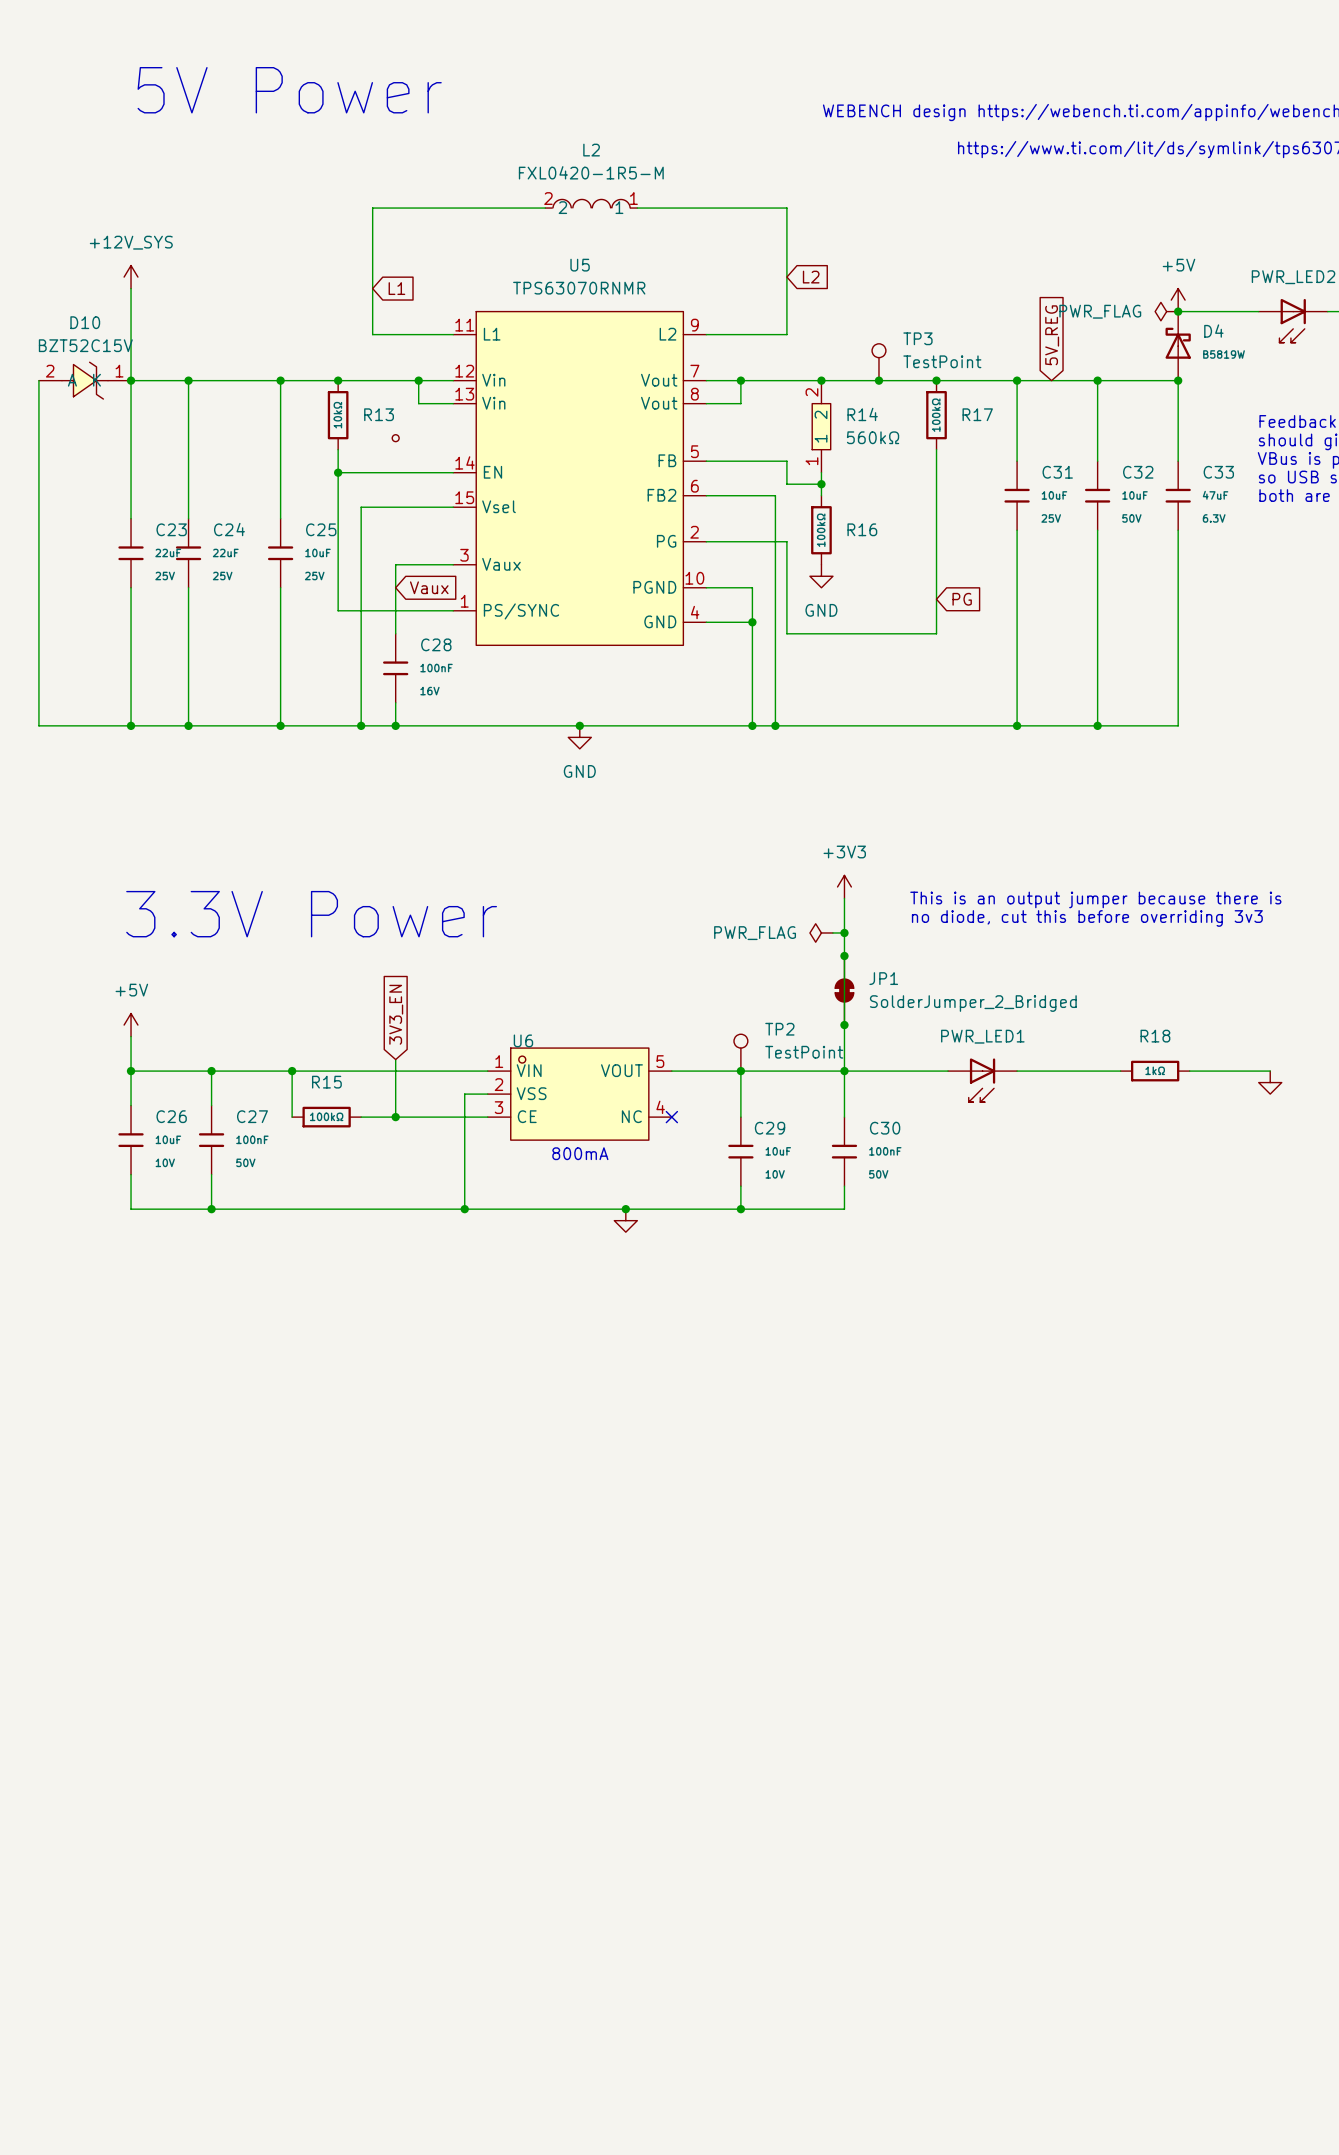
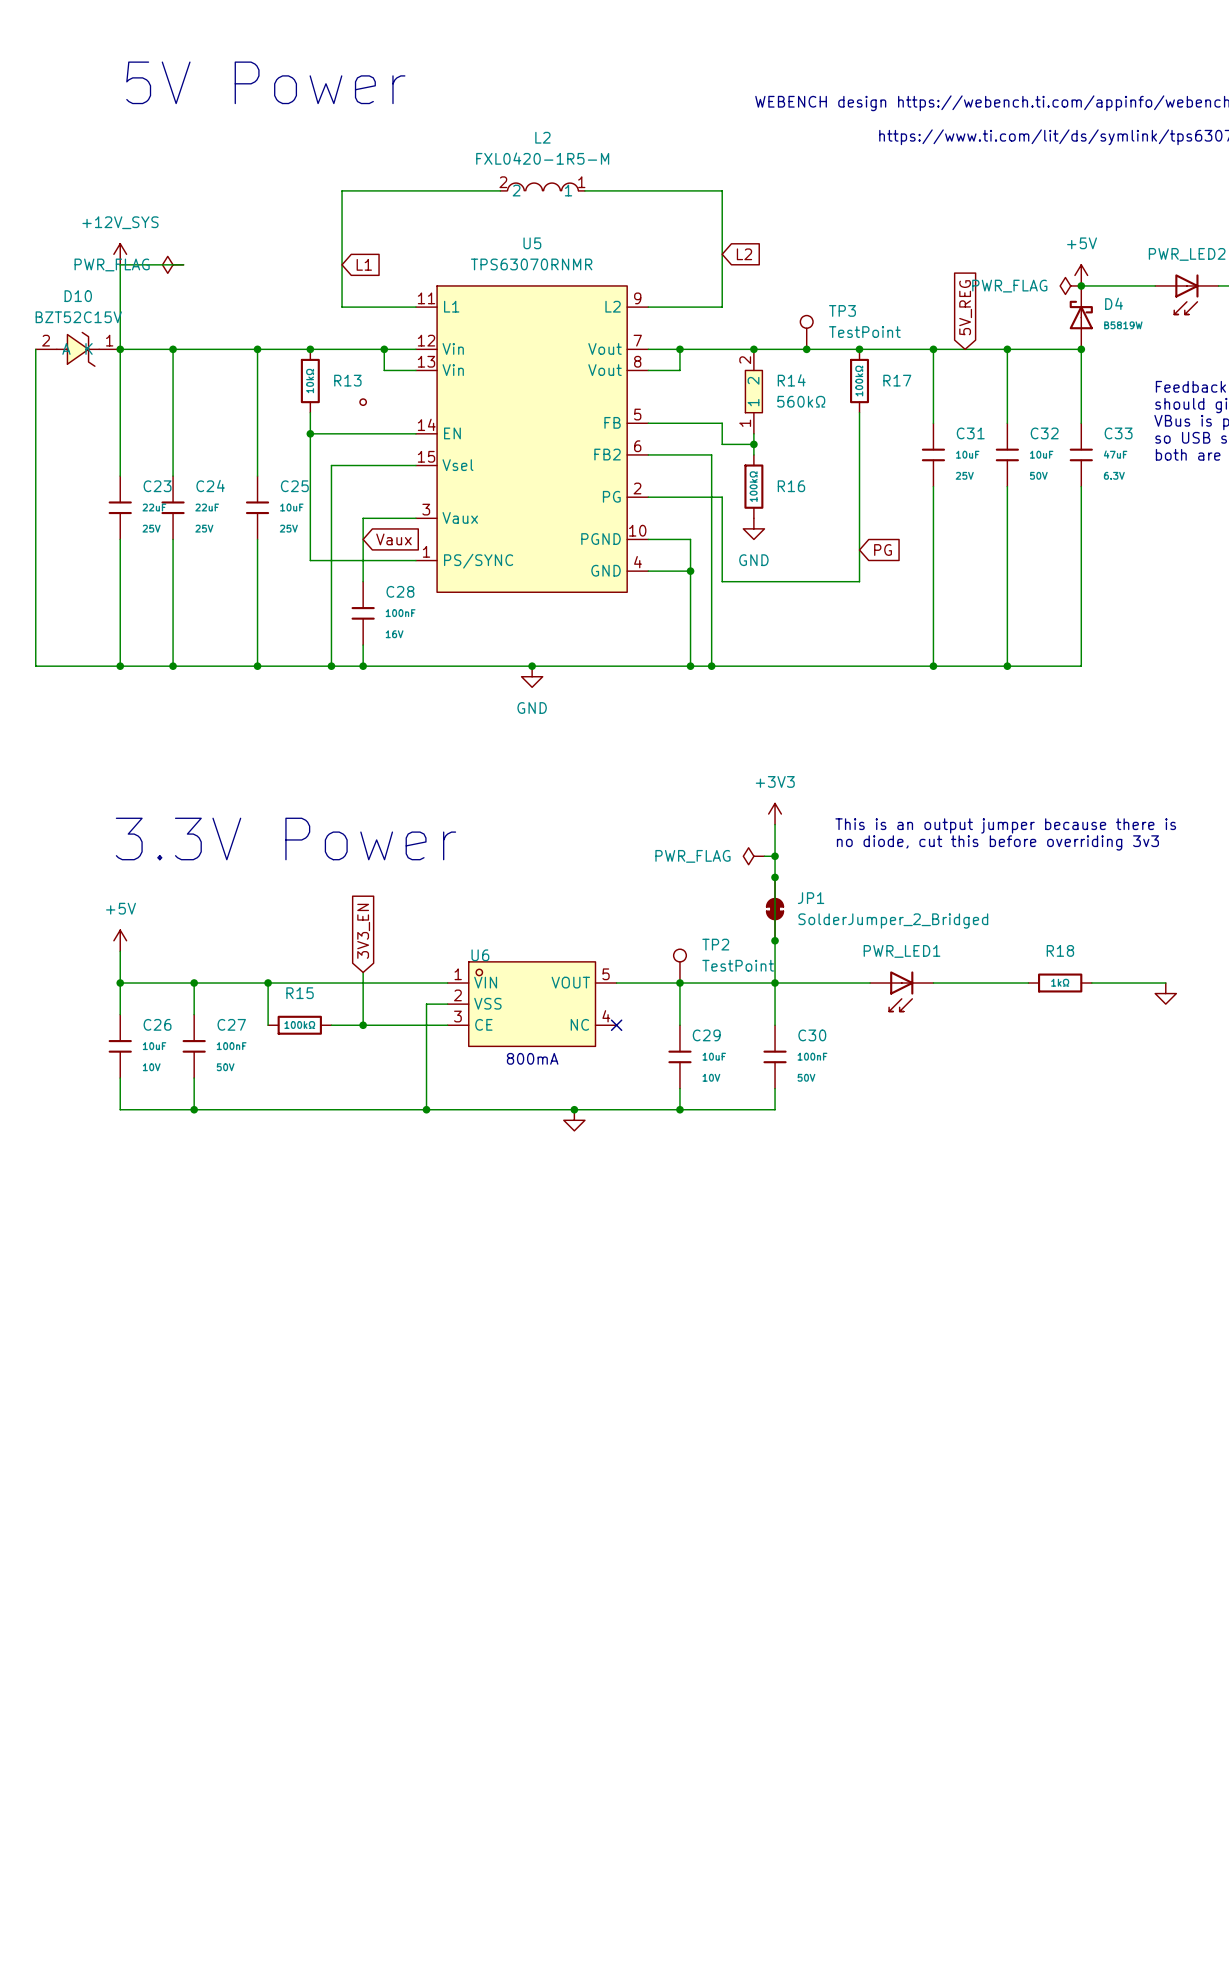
wire: none -> (120, 264) (183, 264)
power symbol: none -> PWR_FLAG (173, 264)

